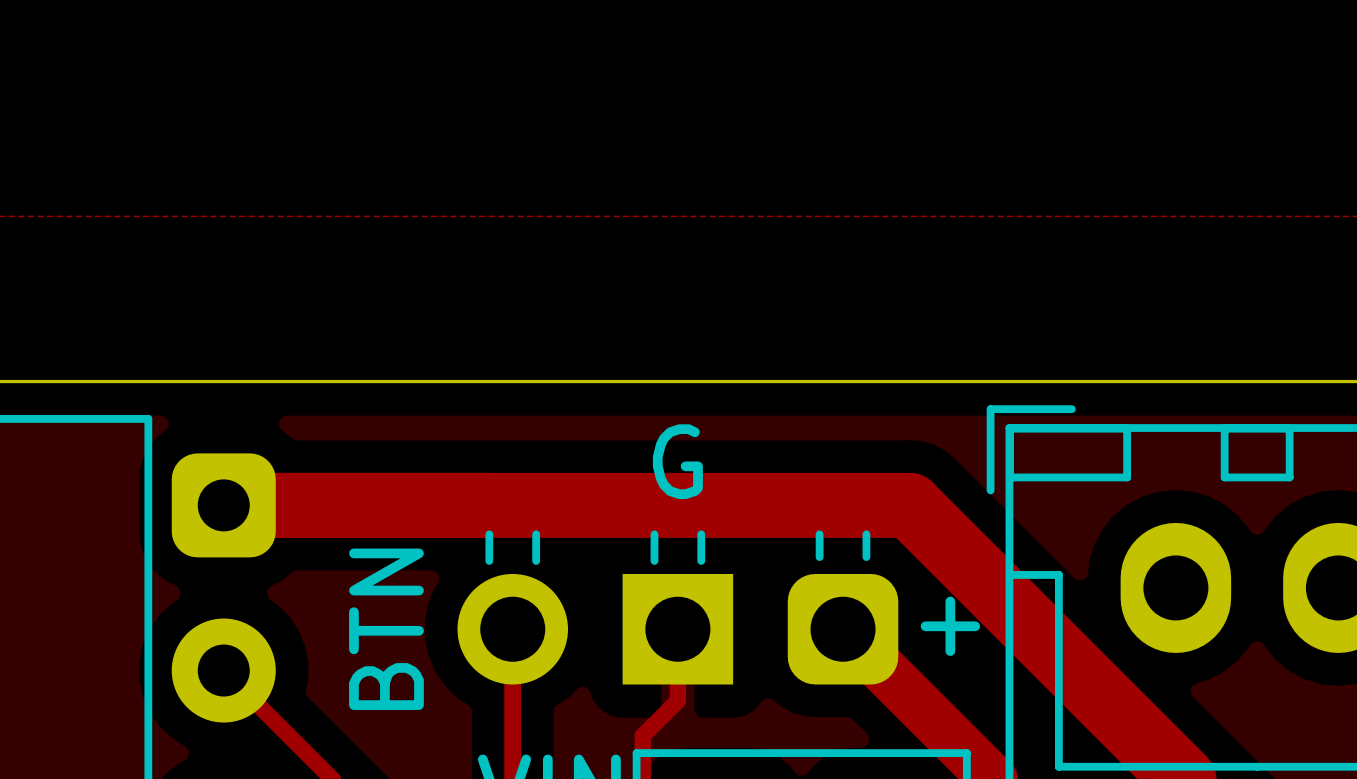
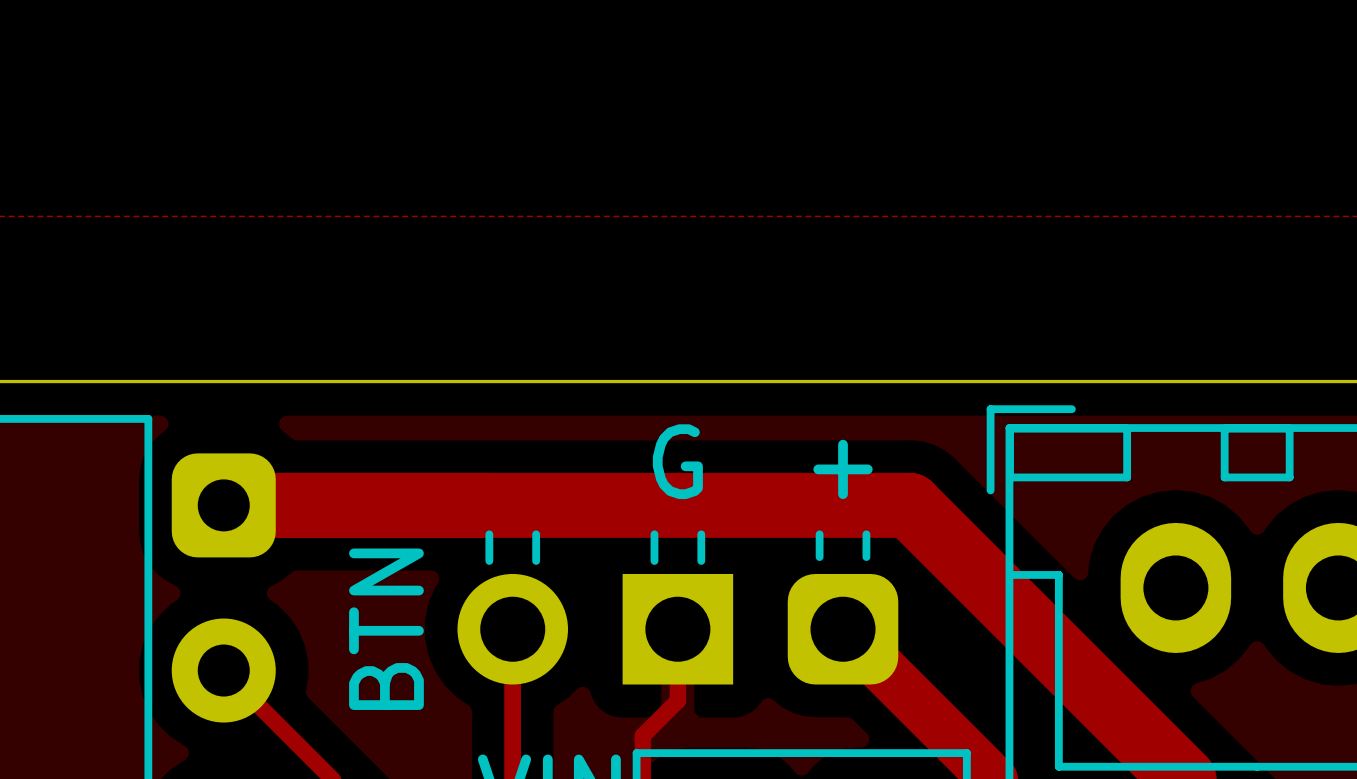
text position: + (950, 626) -> + (843, 469)

